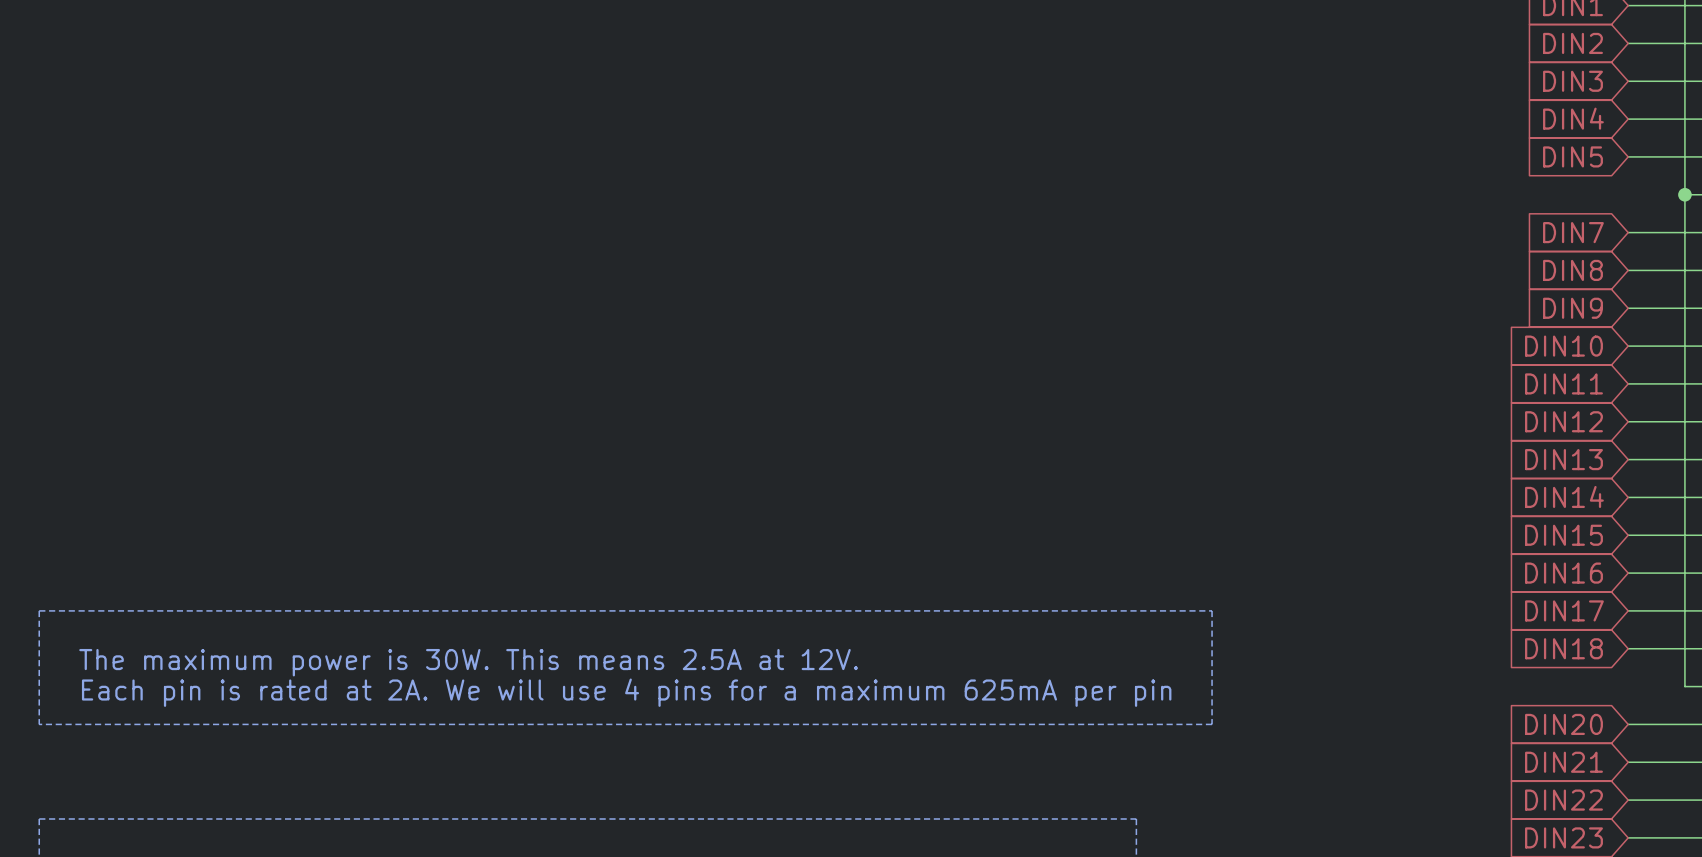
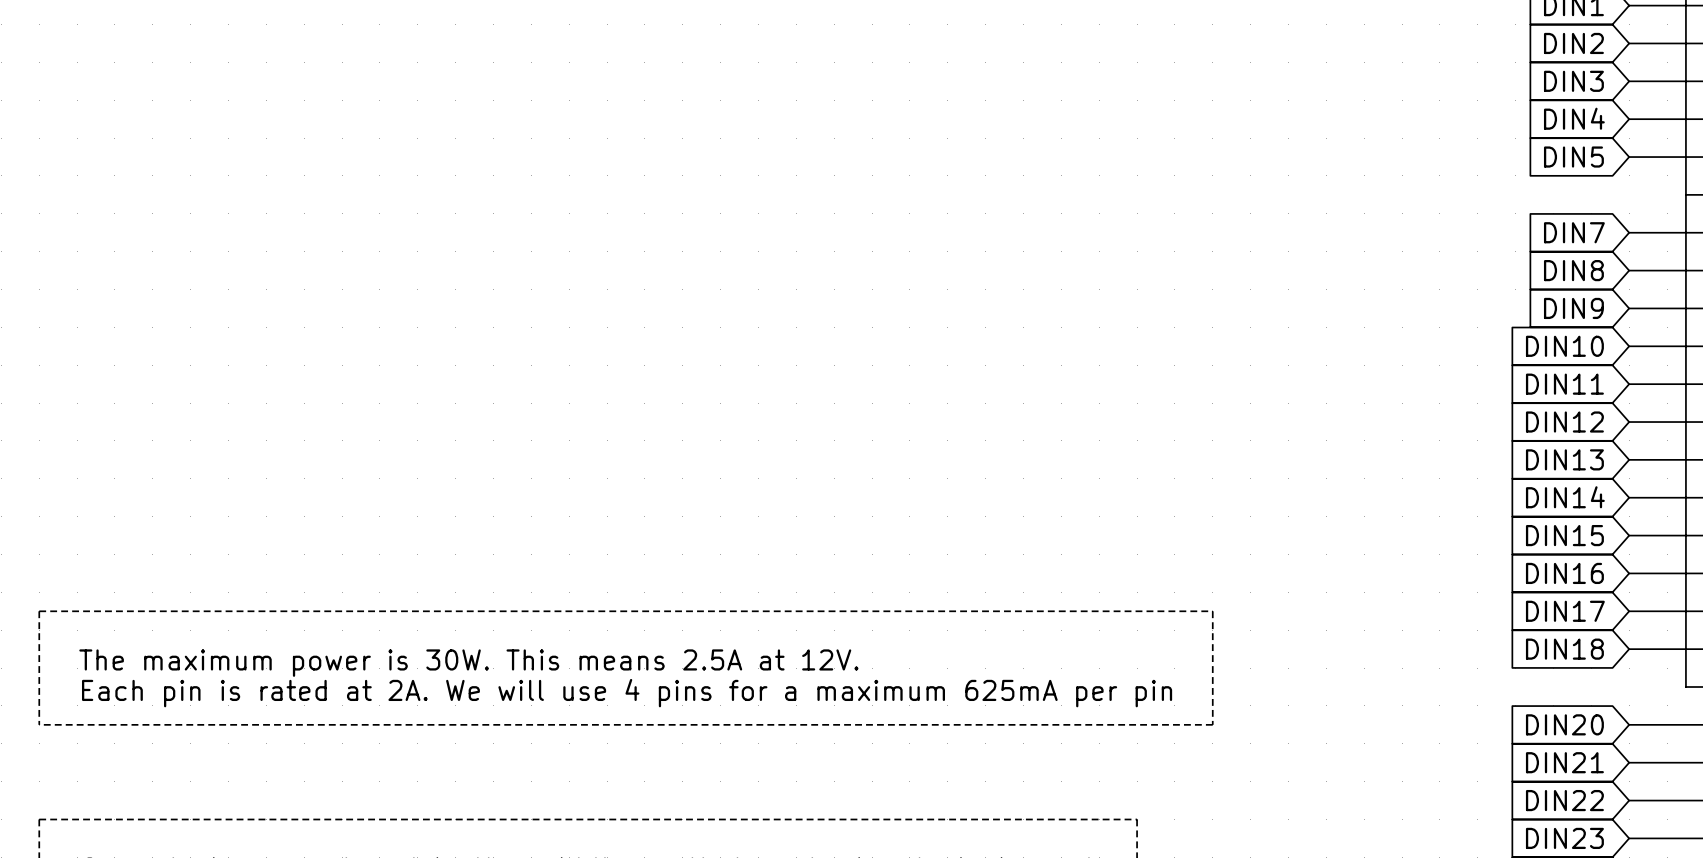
junction: (1684, 194) -> none

